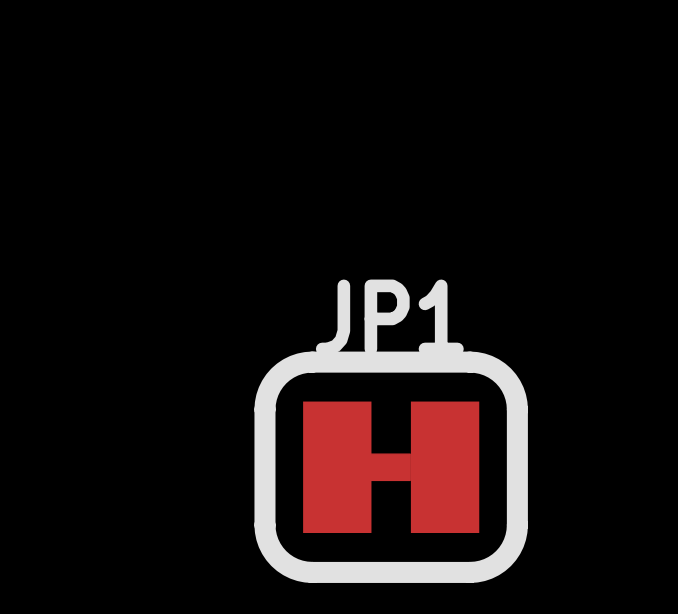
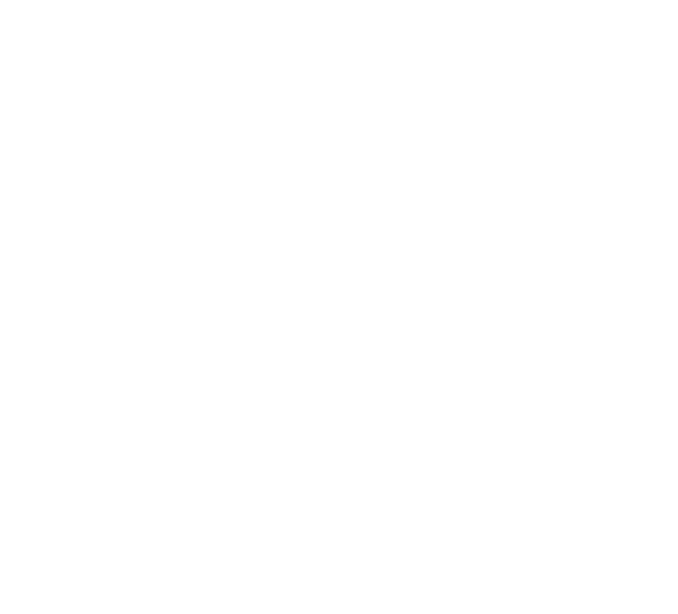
JP1: (391, 467) -> none

